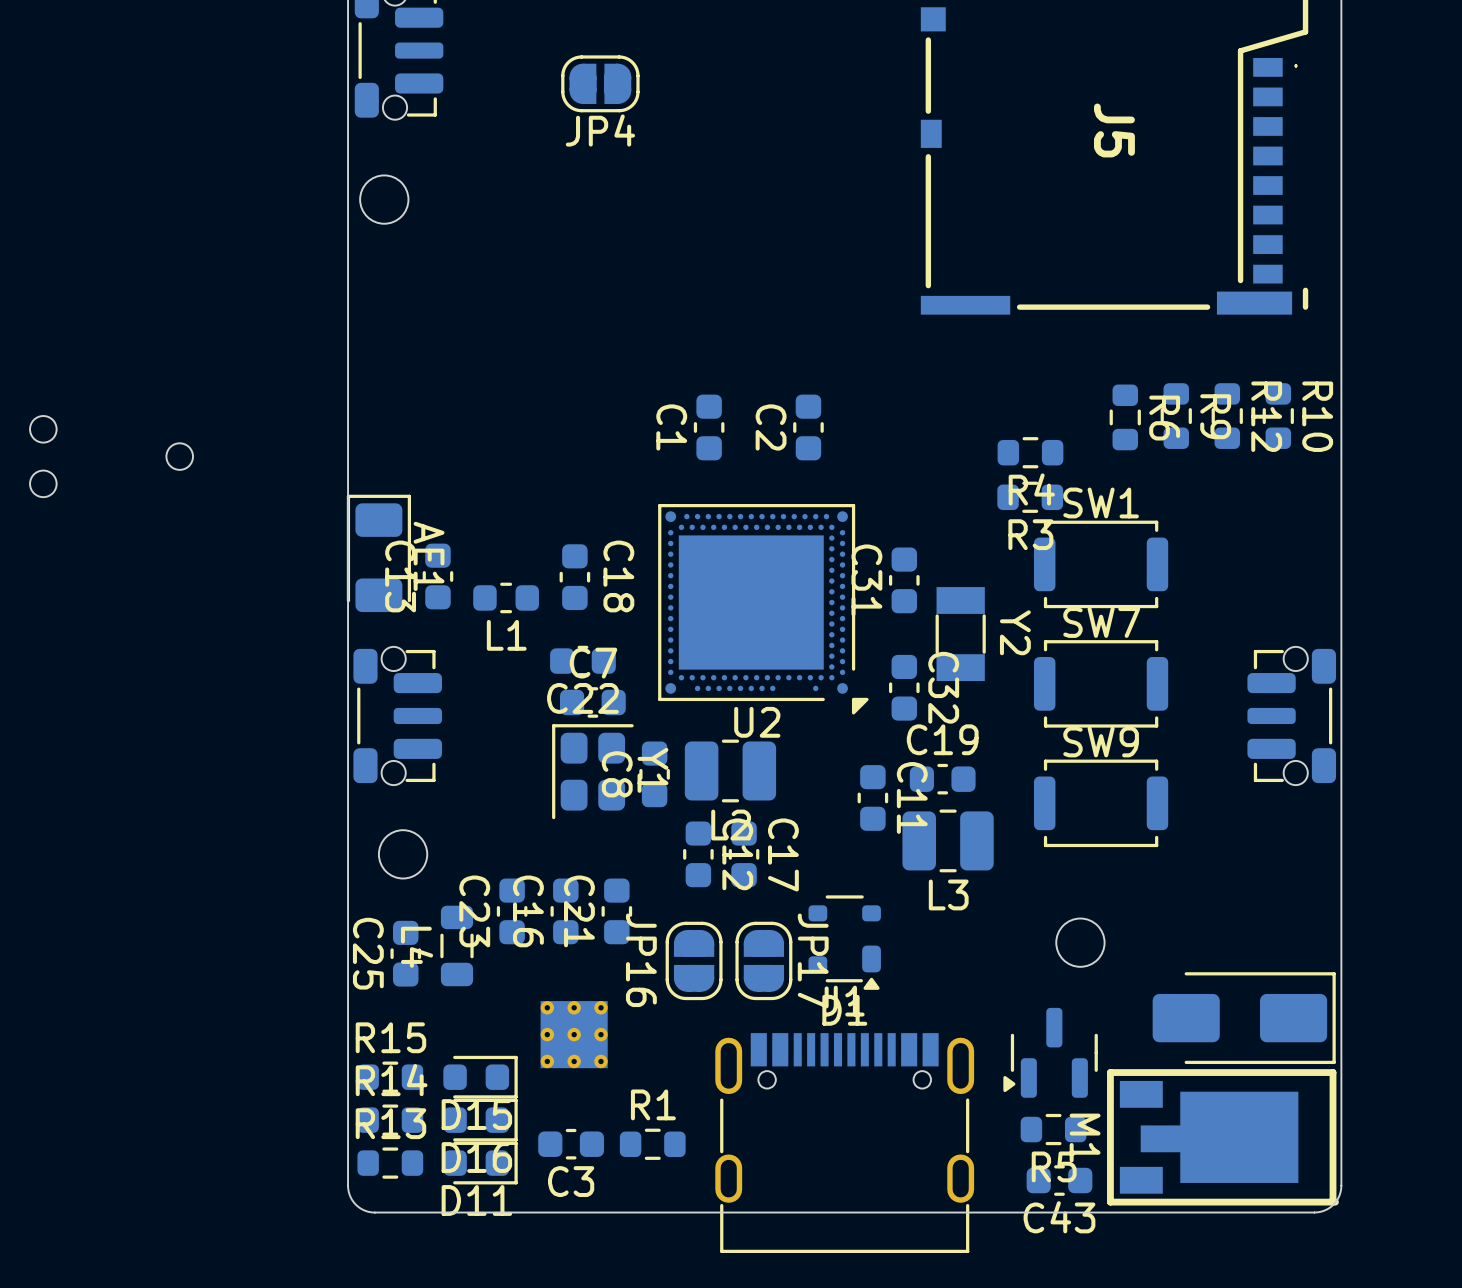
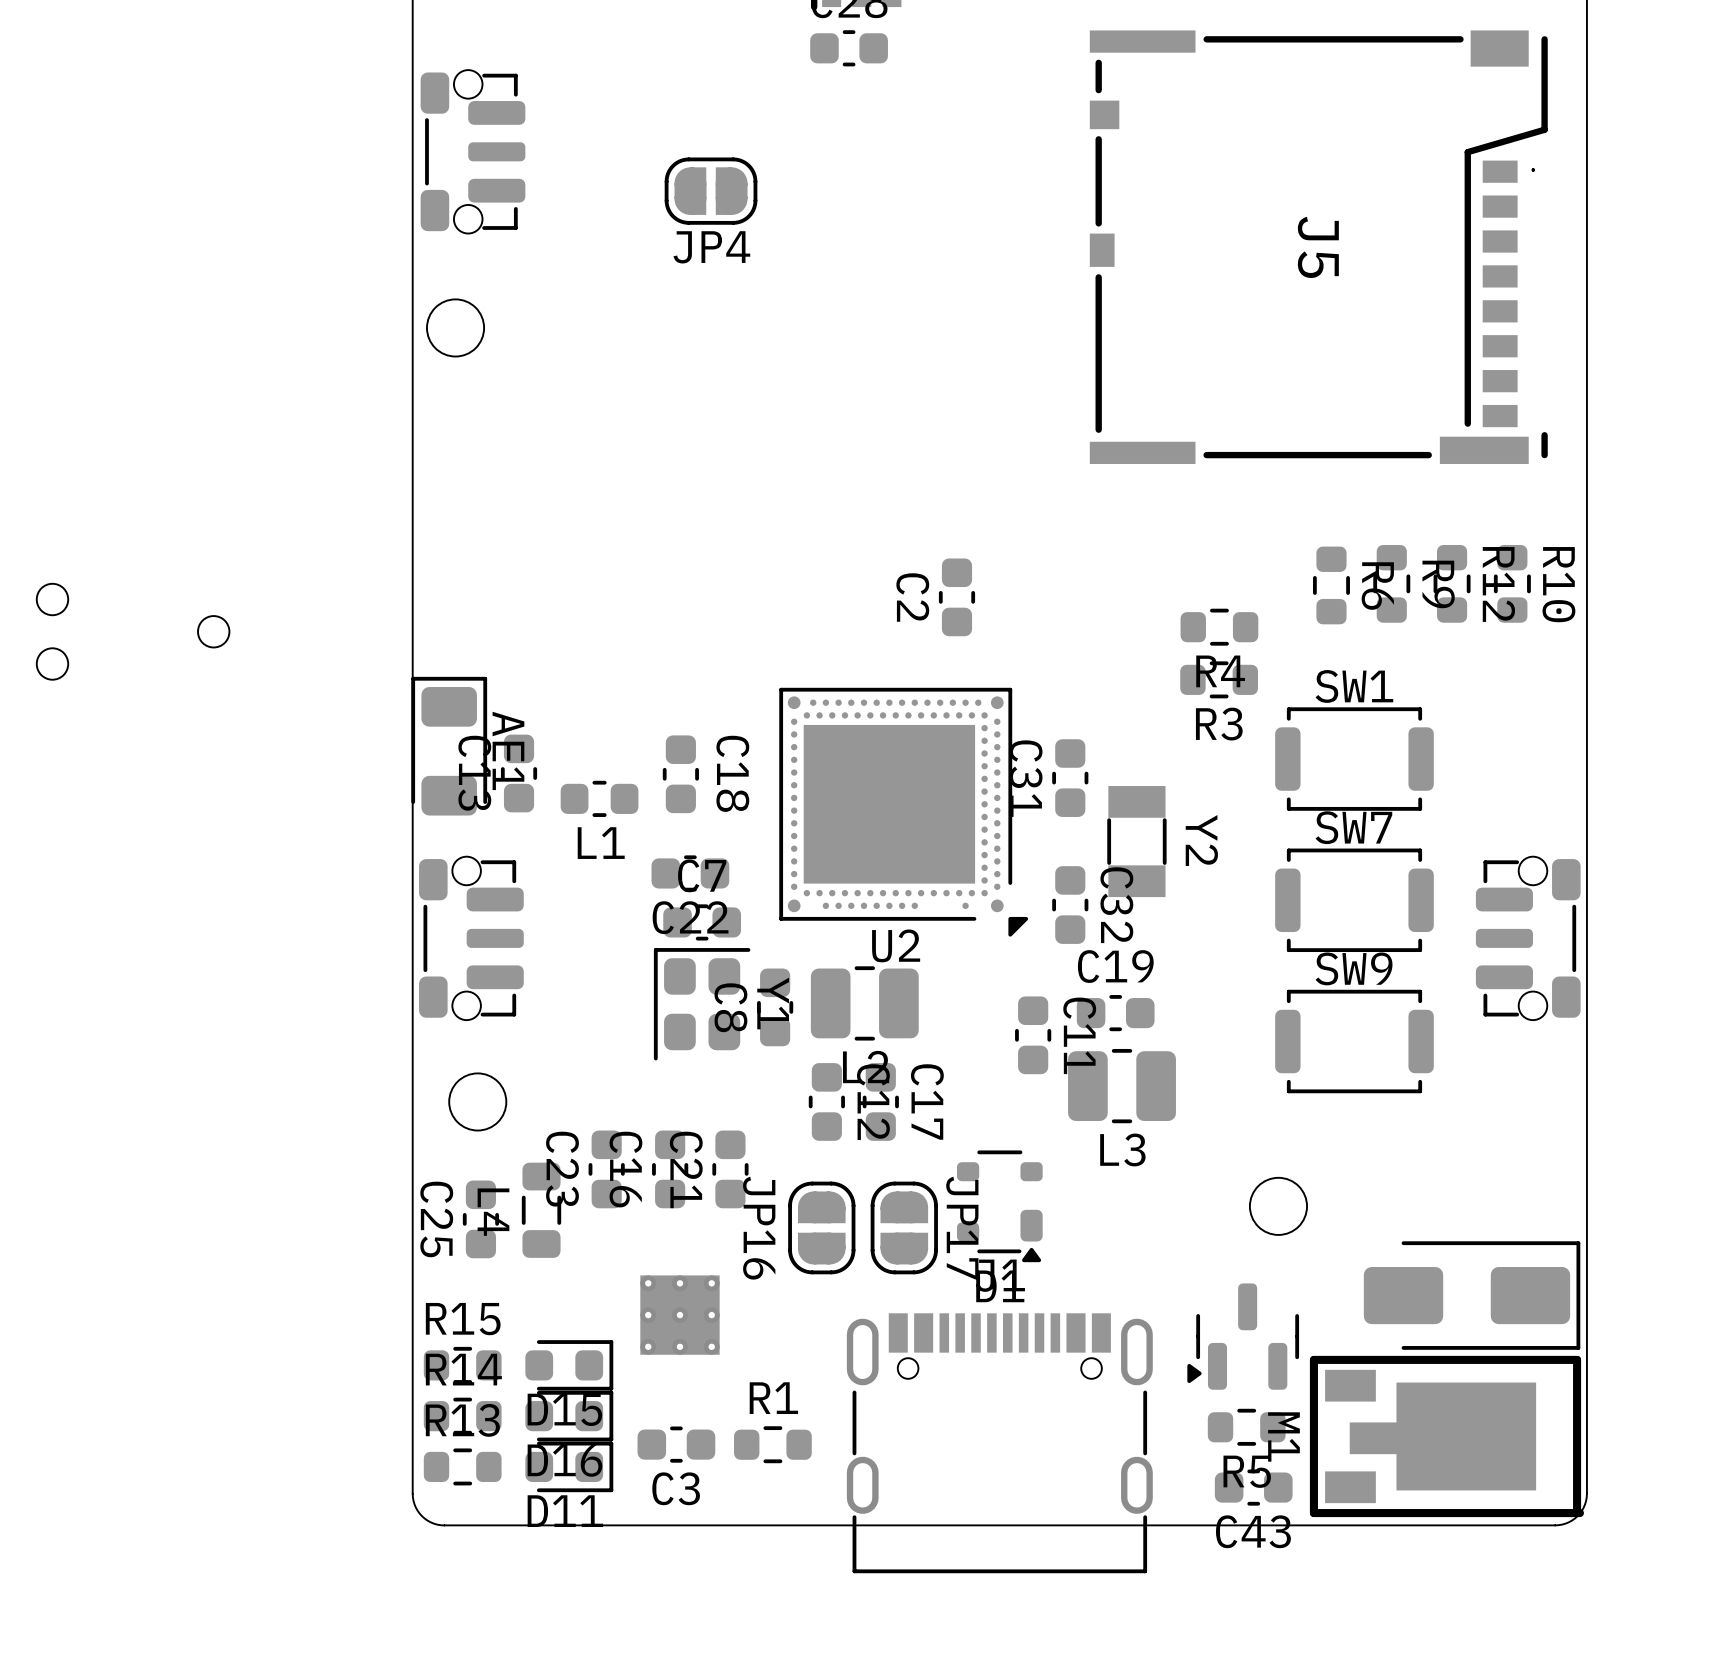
C1: (709, 427) -> none
SW1 position: (1101, 564) -> (1354, 759)
SW7 position: (1101, 683) -> (1354, 900)
SW9 position: (1101, 803) -> (1354, 1041)

